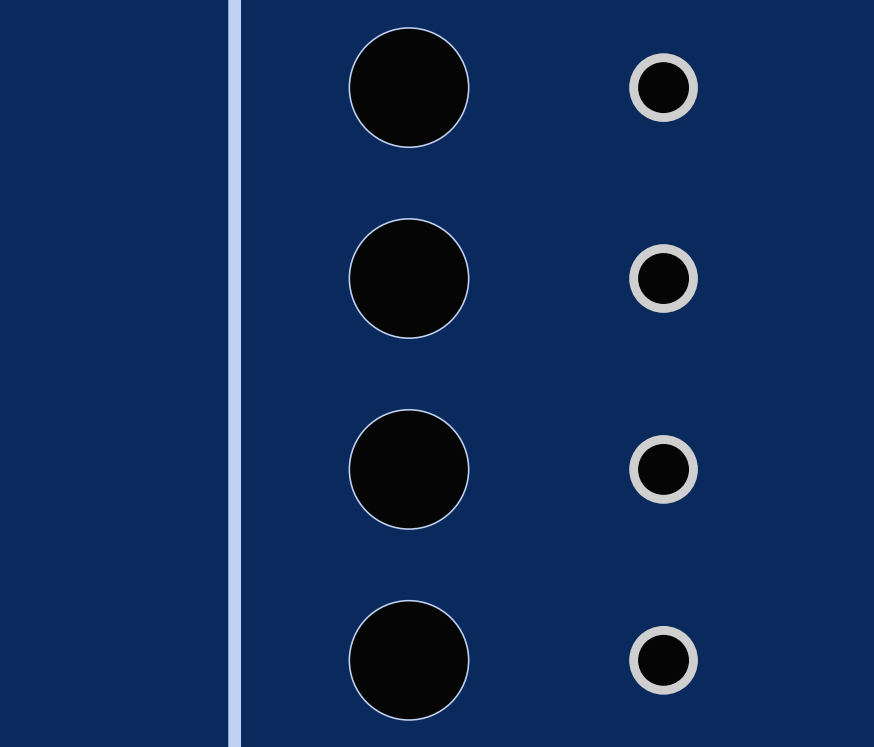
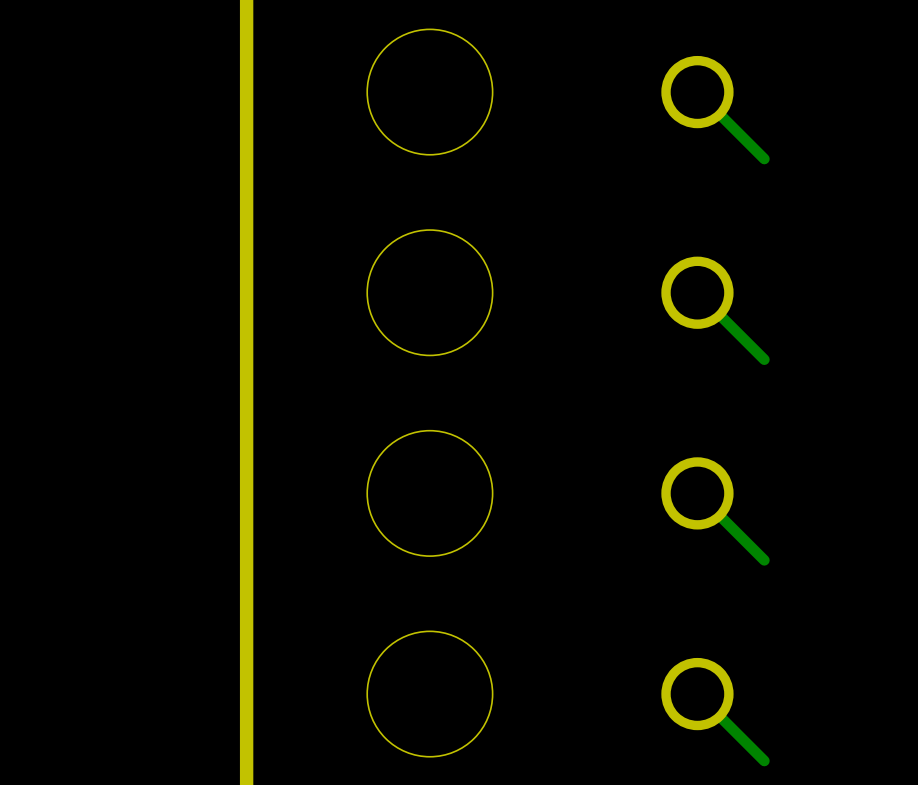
track: none -> (697, 92) (764, 158)
track: none -> (697, 292) (764, 359)
track: none -> (697, 493) (764, 560)
track: none -> (697, 694) (764, 760)

